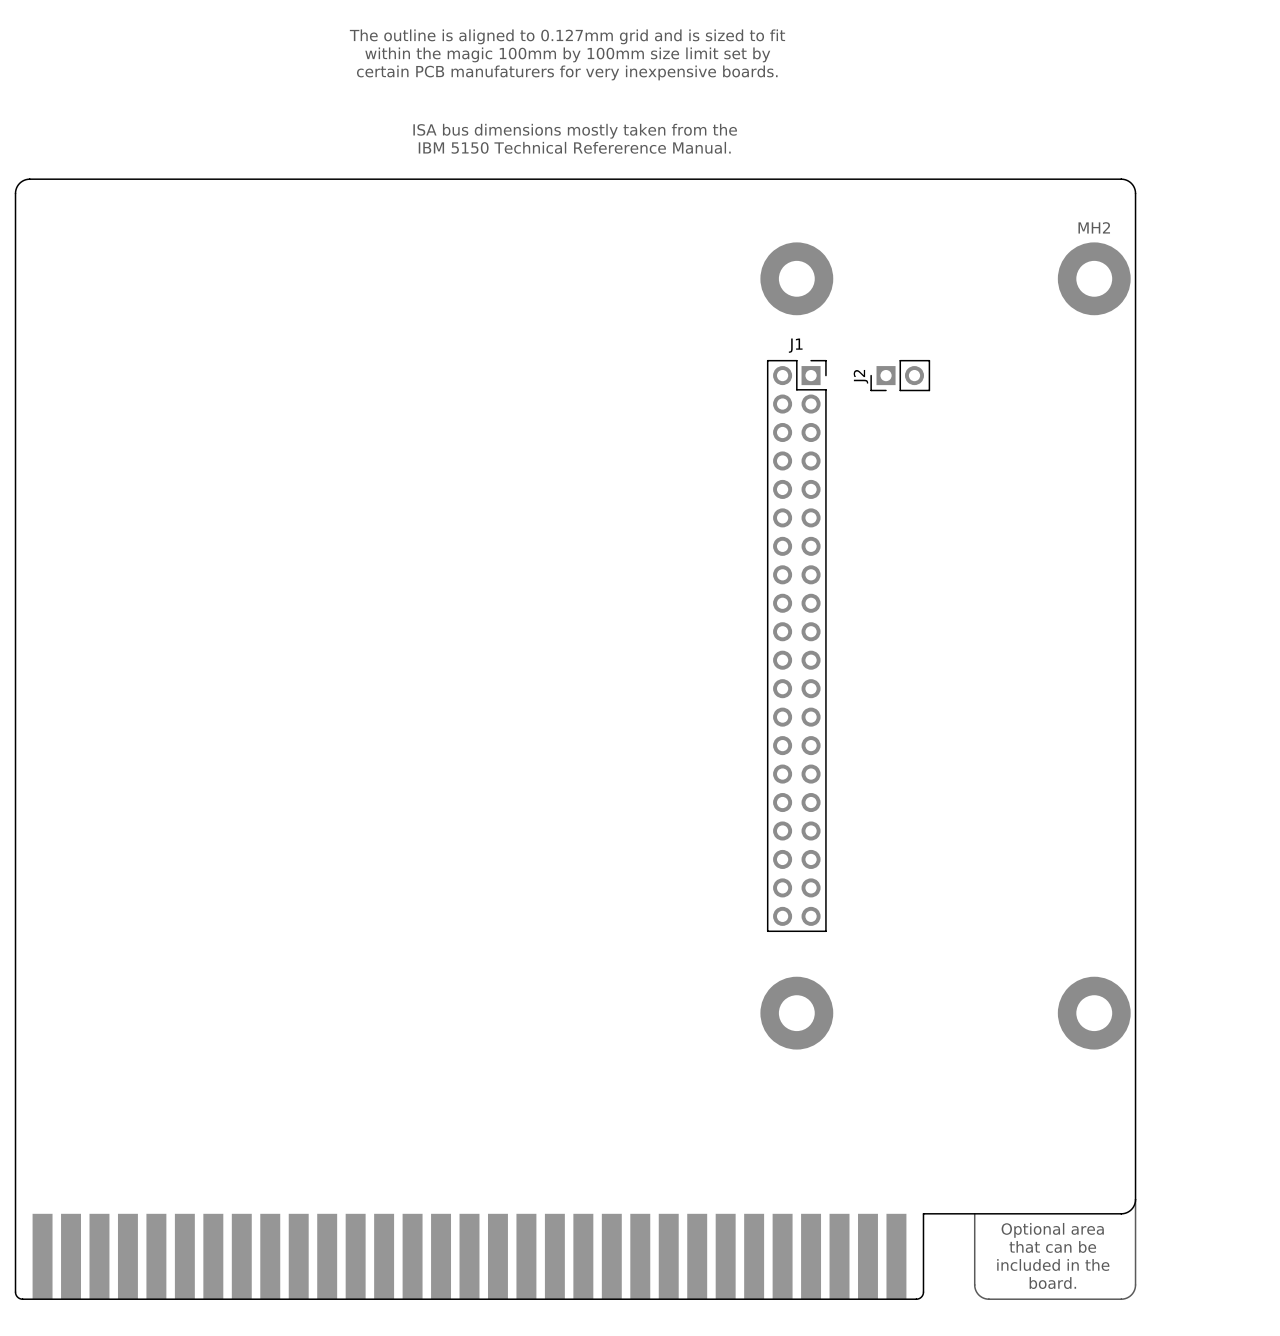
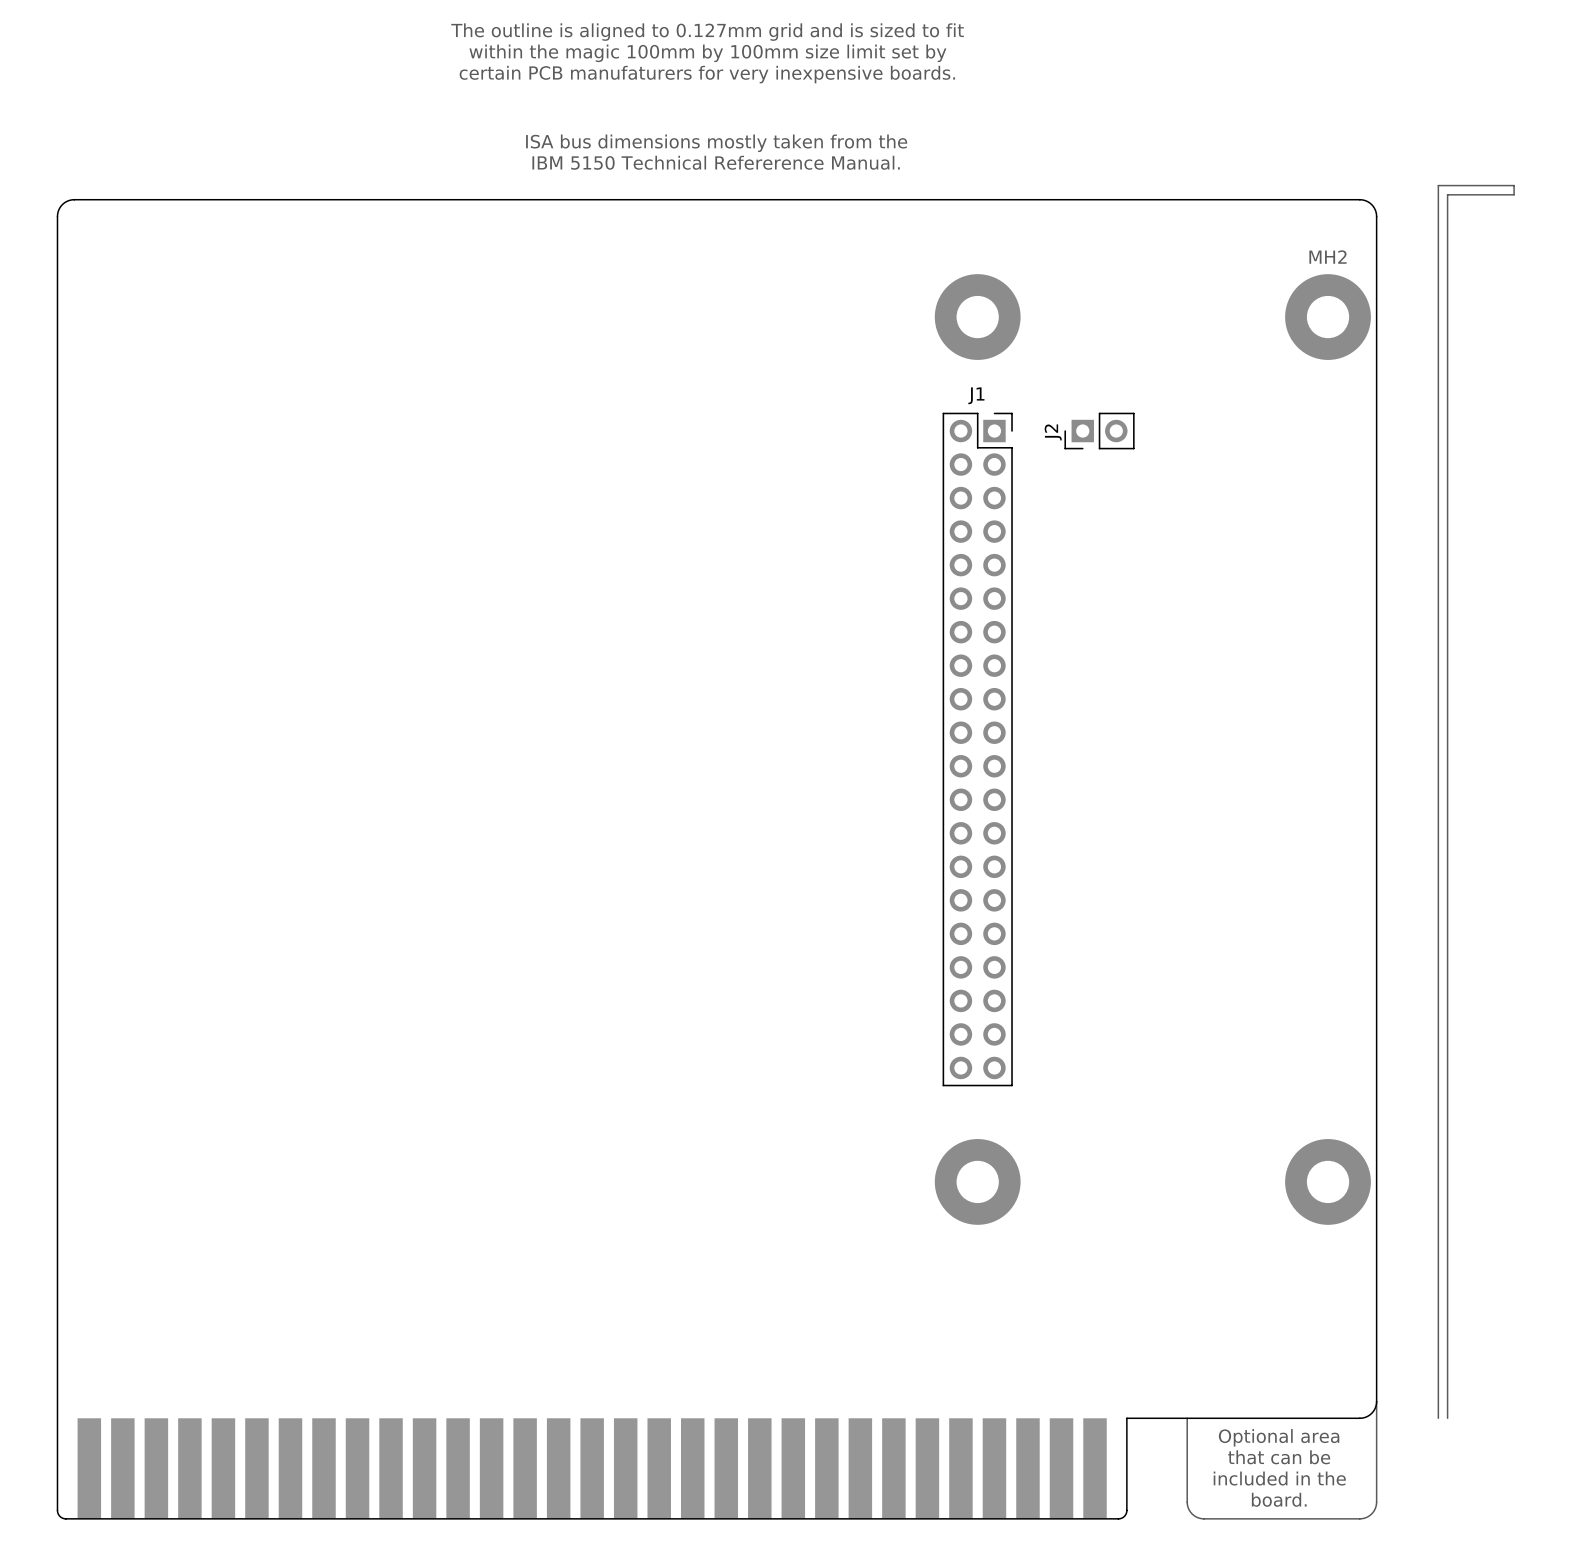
line: none -> (1514, 194) (1514, 185) (1438, 185) (1438, 1418)
line: none -> (1514, 194) (1447, 194) (1447, 1418)

